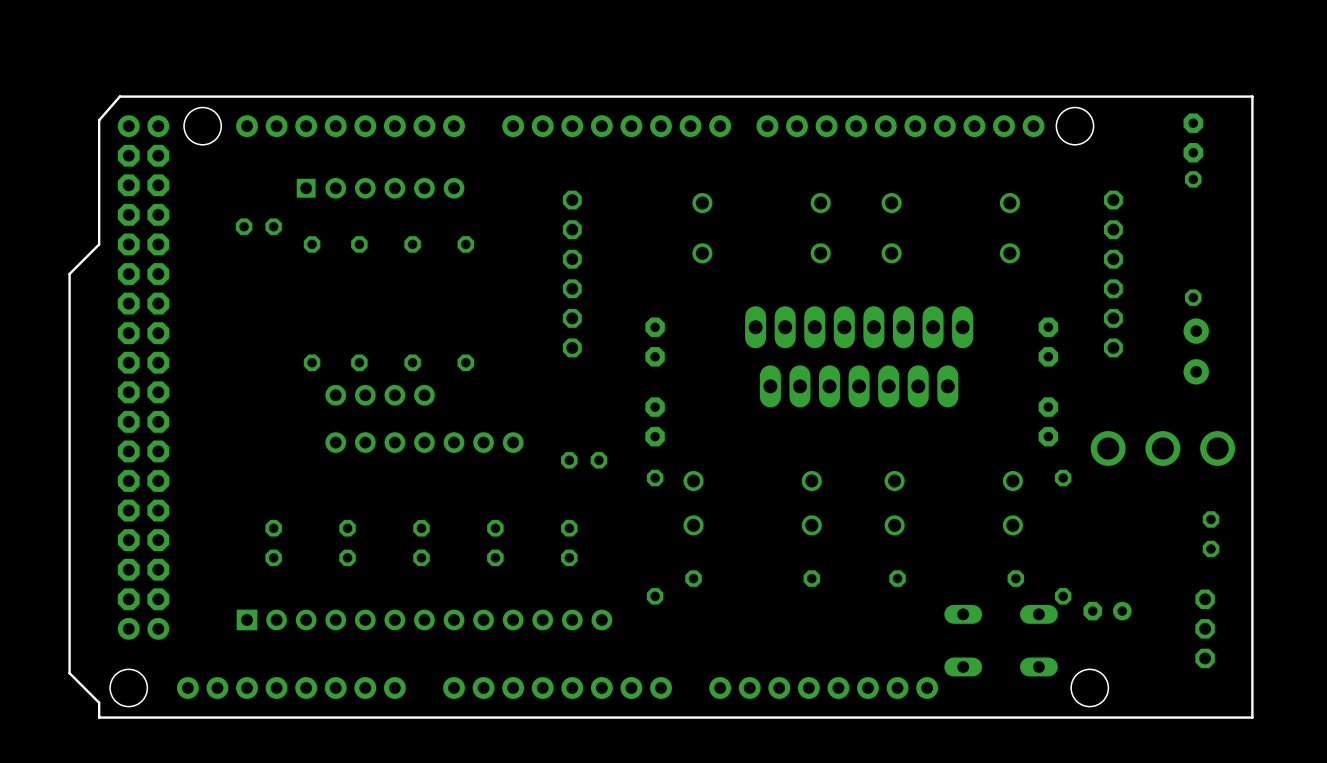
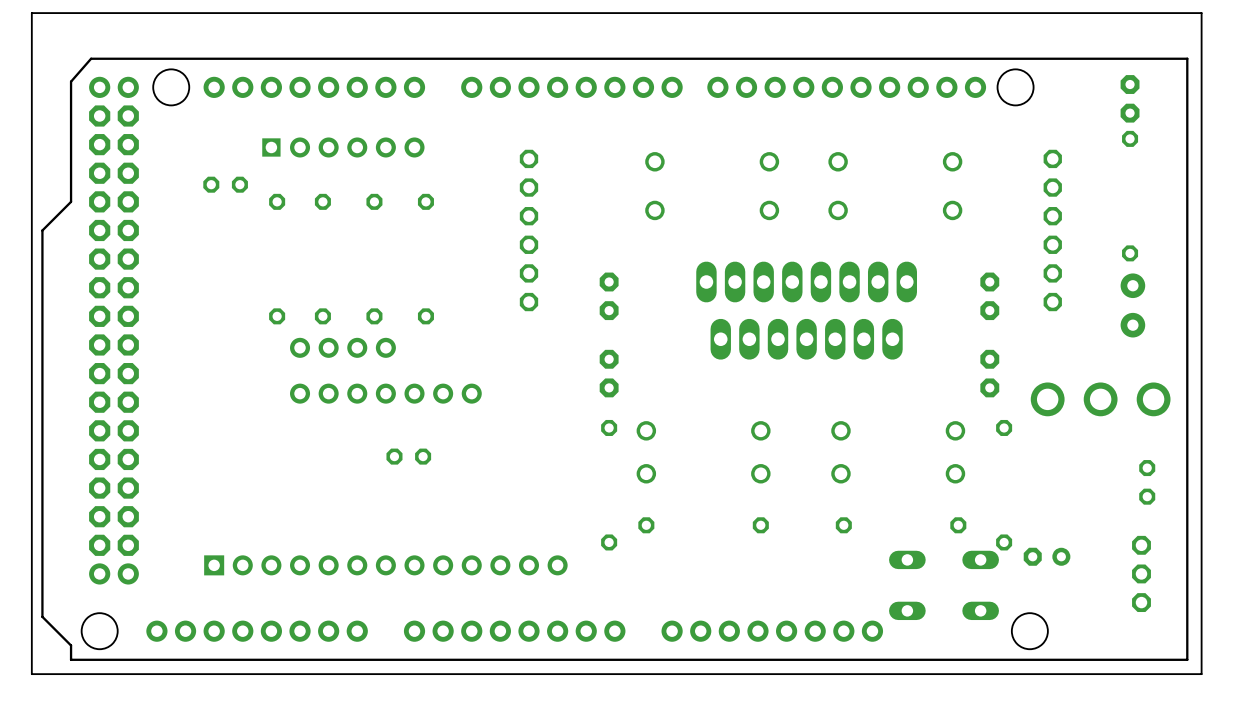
board edge: none -> (1201, 13) (31, 13) (31, 674) (1201, 674) (1201, 13)
part: (584, 460) -> none
part: none -> (408, 456)
part: (273, 543) -> none
part: (347, 543) -> none
part: (421, 543) -> none
part: (495, 543) -> none
part: (569, 543) -> none

